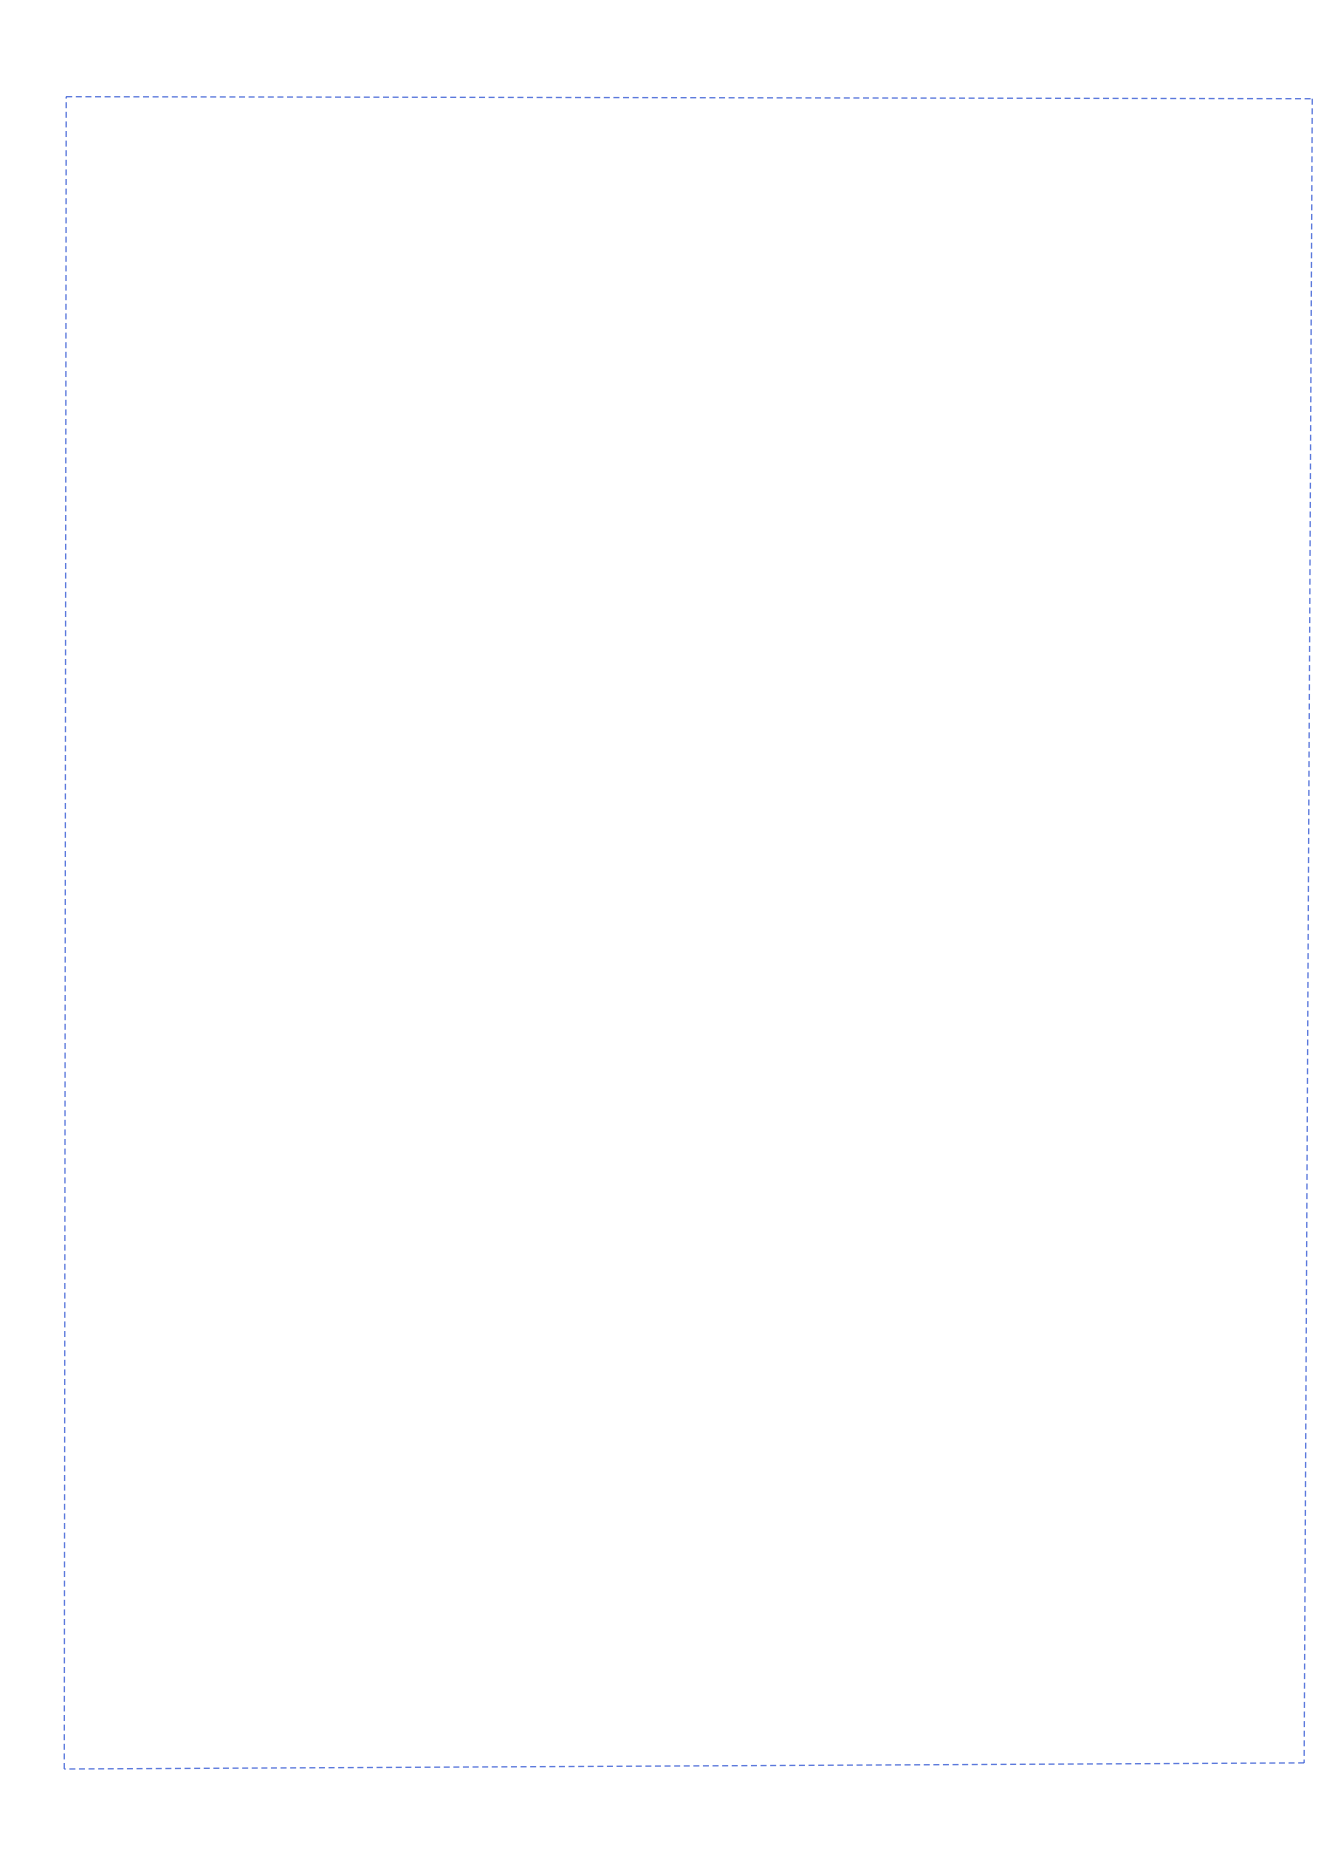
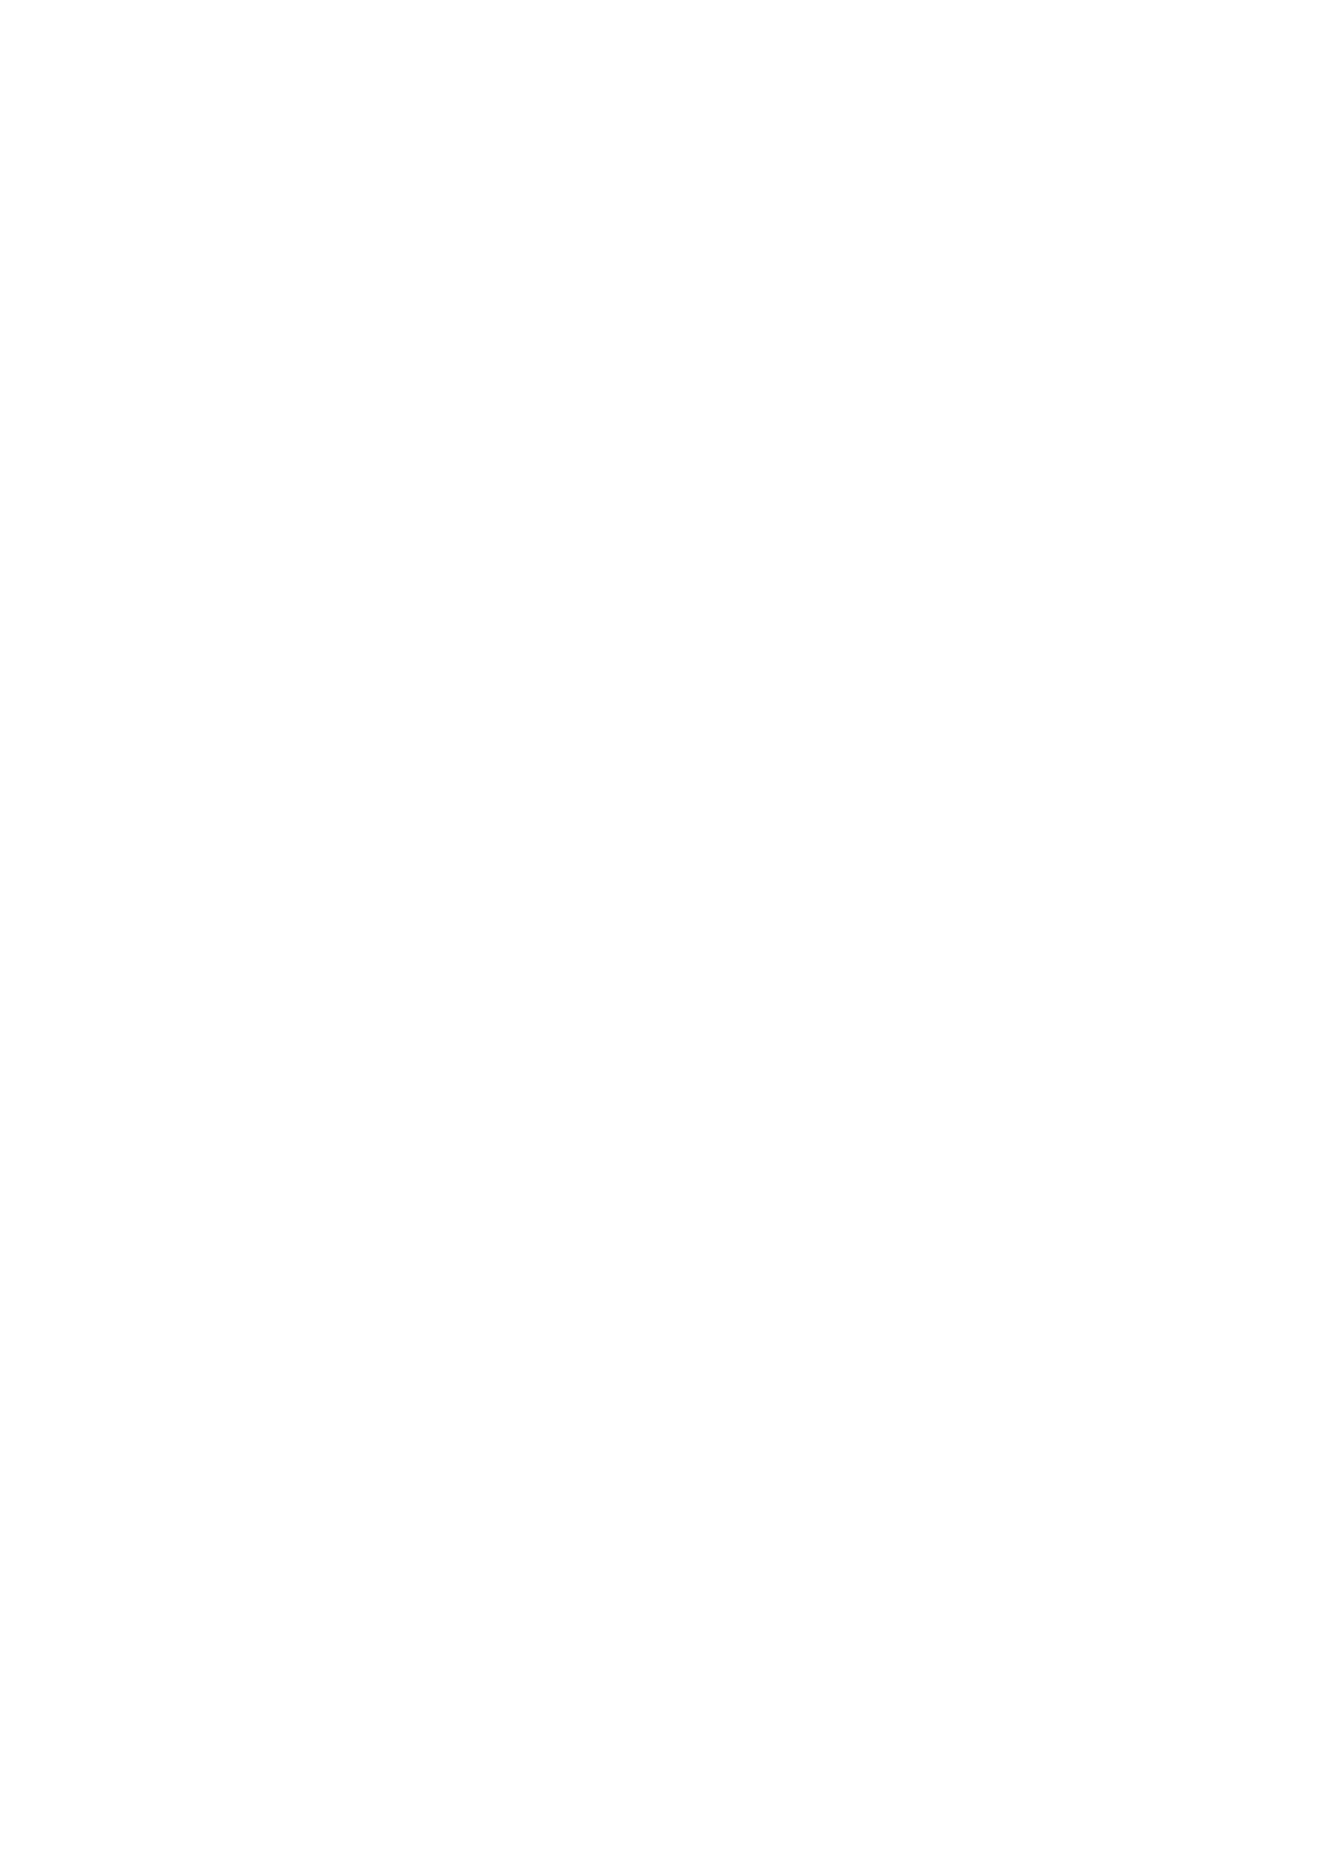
zone outline: (66, 96) (1312, 98) (1304, 1762) (64, 1769) (66, 96) -> none

